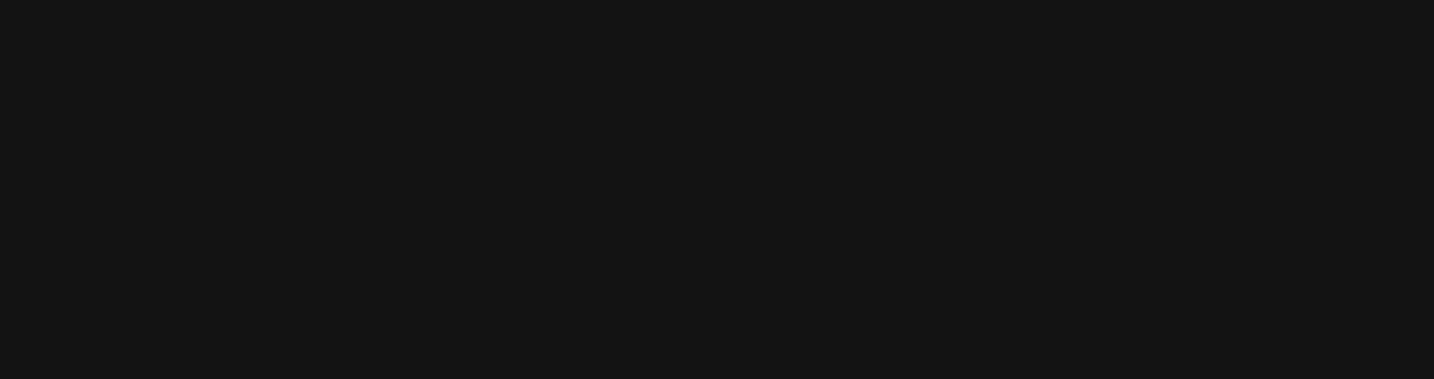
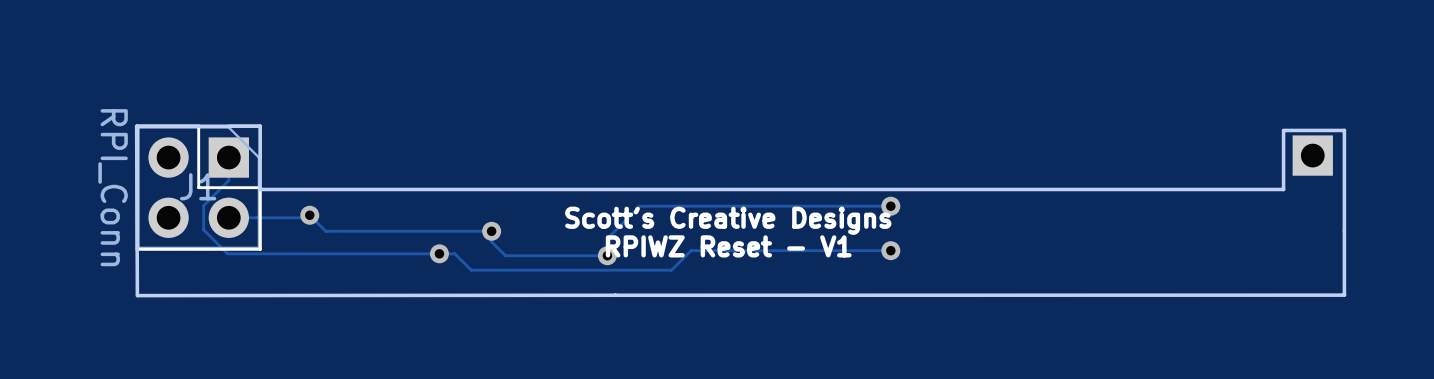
board edge: none -> (1283, 130) (1344, 130) (1344, 294)
board edge: none -> (1283, 131) (1283, 189) (260, 189) (260, 126) (136, 126) (137, 295)
part: none -> (1312, 155)
track: none -> (228, 157) (228, 180) (203, 205) (203, 229) (227, 253) (454, 253) (471, 270) (671, 270) (691, 250) (890, 250)
J1: none -> RPI_Conn (198, 187)
track: none -> (890, 206) (639, 206) (607, 238) (607, 255) (505, 255) (491, 241) (491, 231) (325, 231) (312, 217) (228, 217) (235, 210)
via: none -> (890, 206)
via: none -> (309, 215)
text: none -> Scott's Creative Designs (728, 220)
via: none -> (491, 231)
text: none -> RPIWZ Reset - V1 (728, 246)
via: none -> (890, 250)
via: none -> (439, 253)
via: none -> (607, 255)
board edge: none -> (615, 295) (137, 295)
board edge: none -> (1344, 295) (615, 295)

